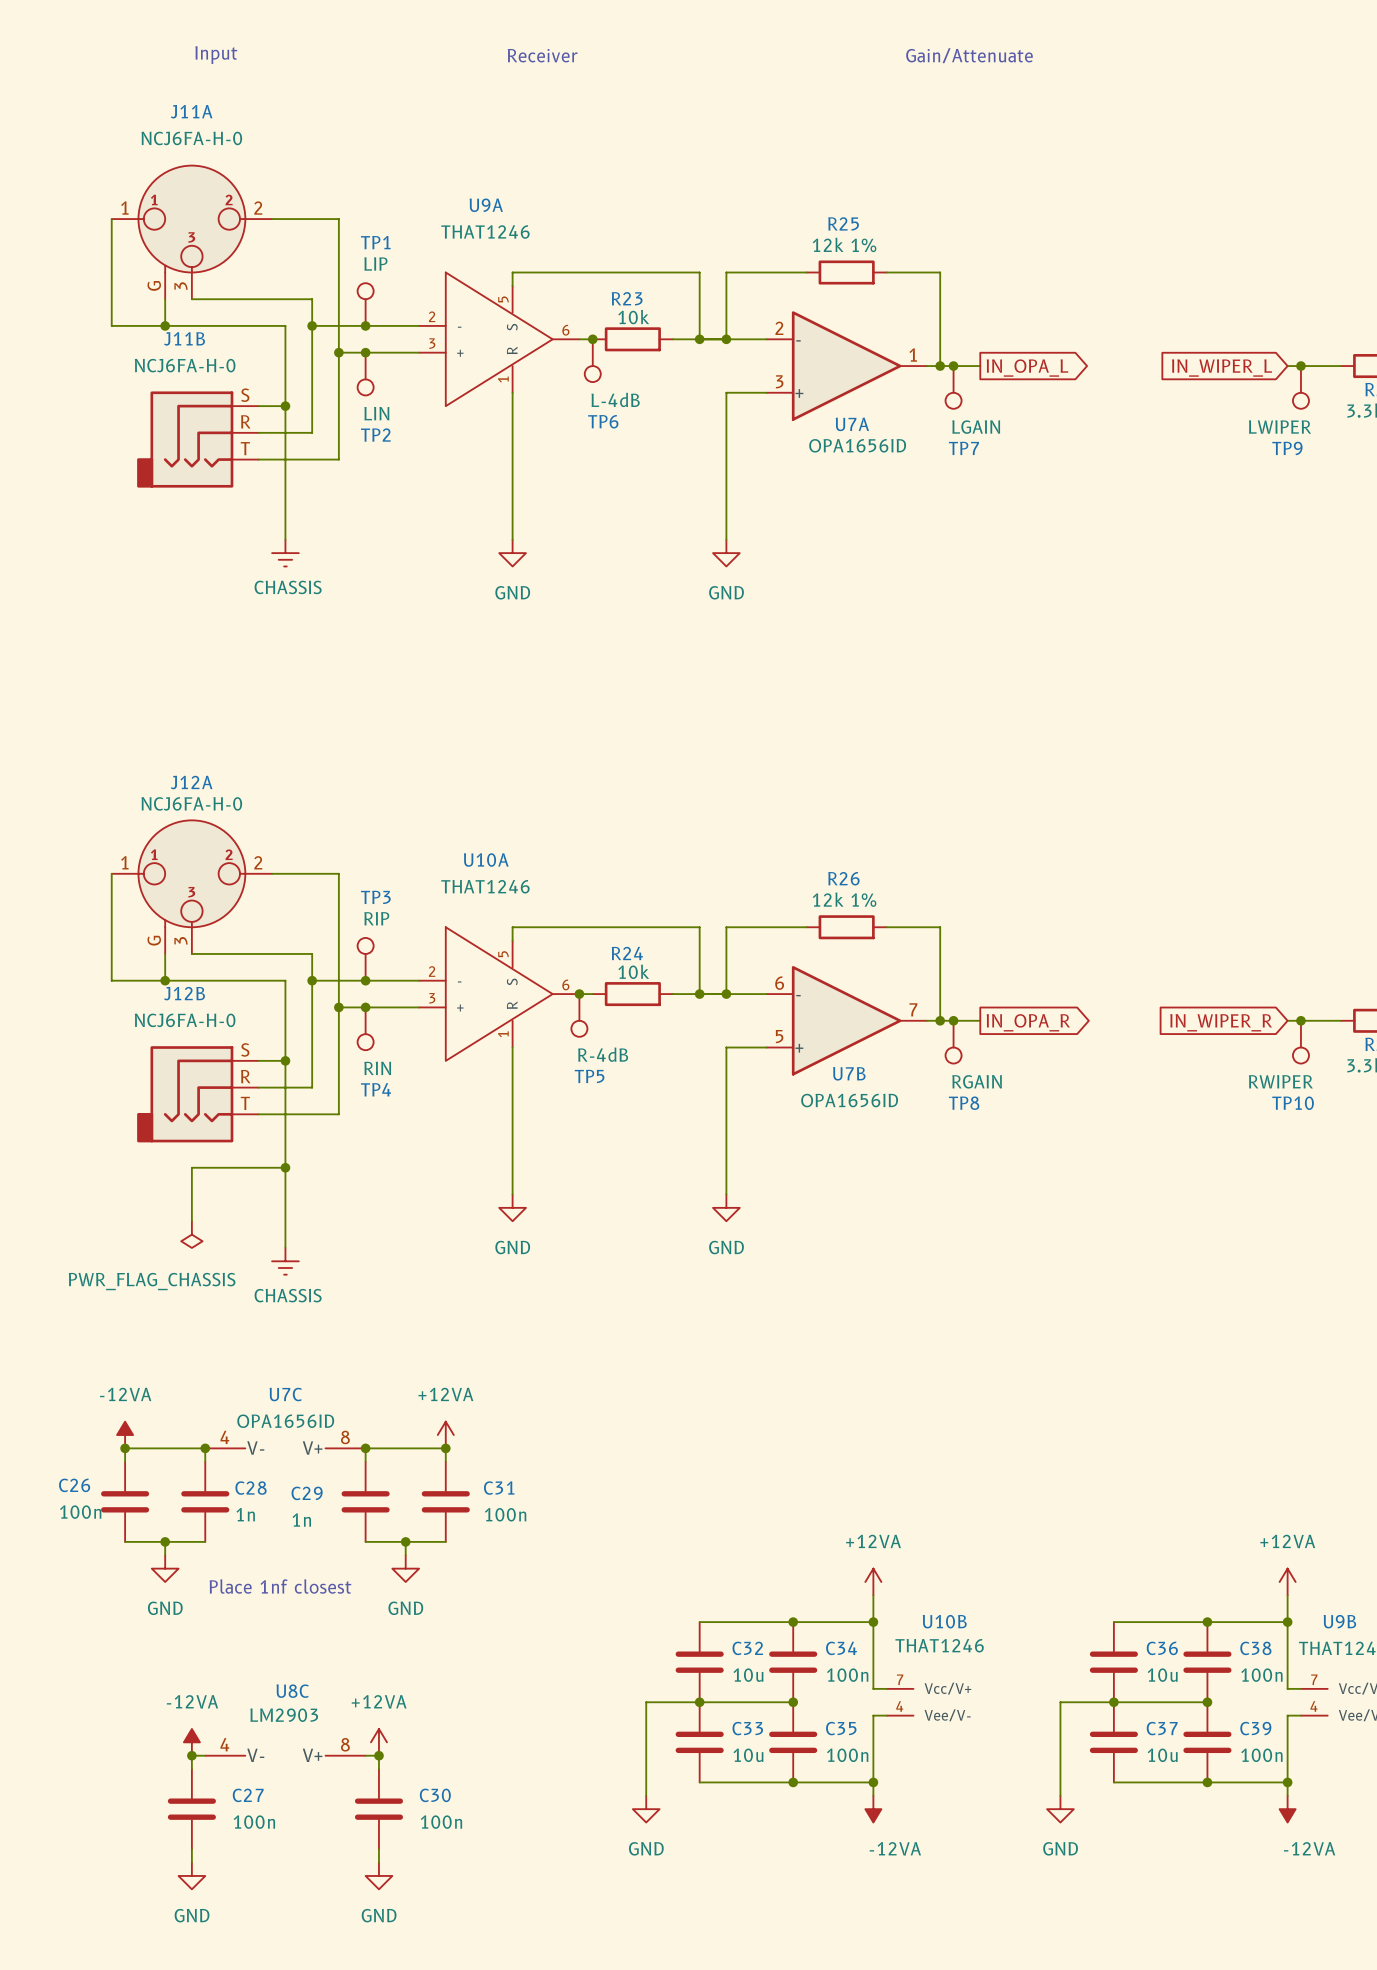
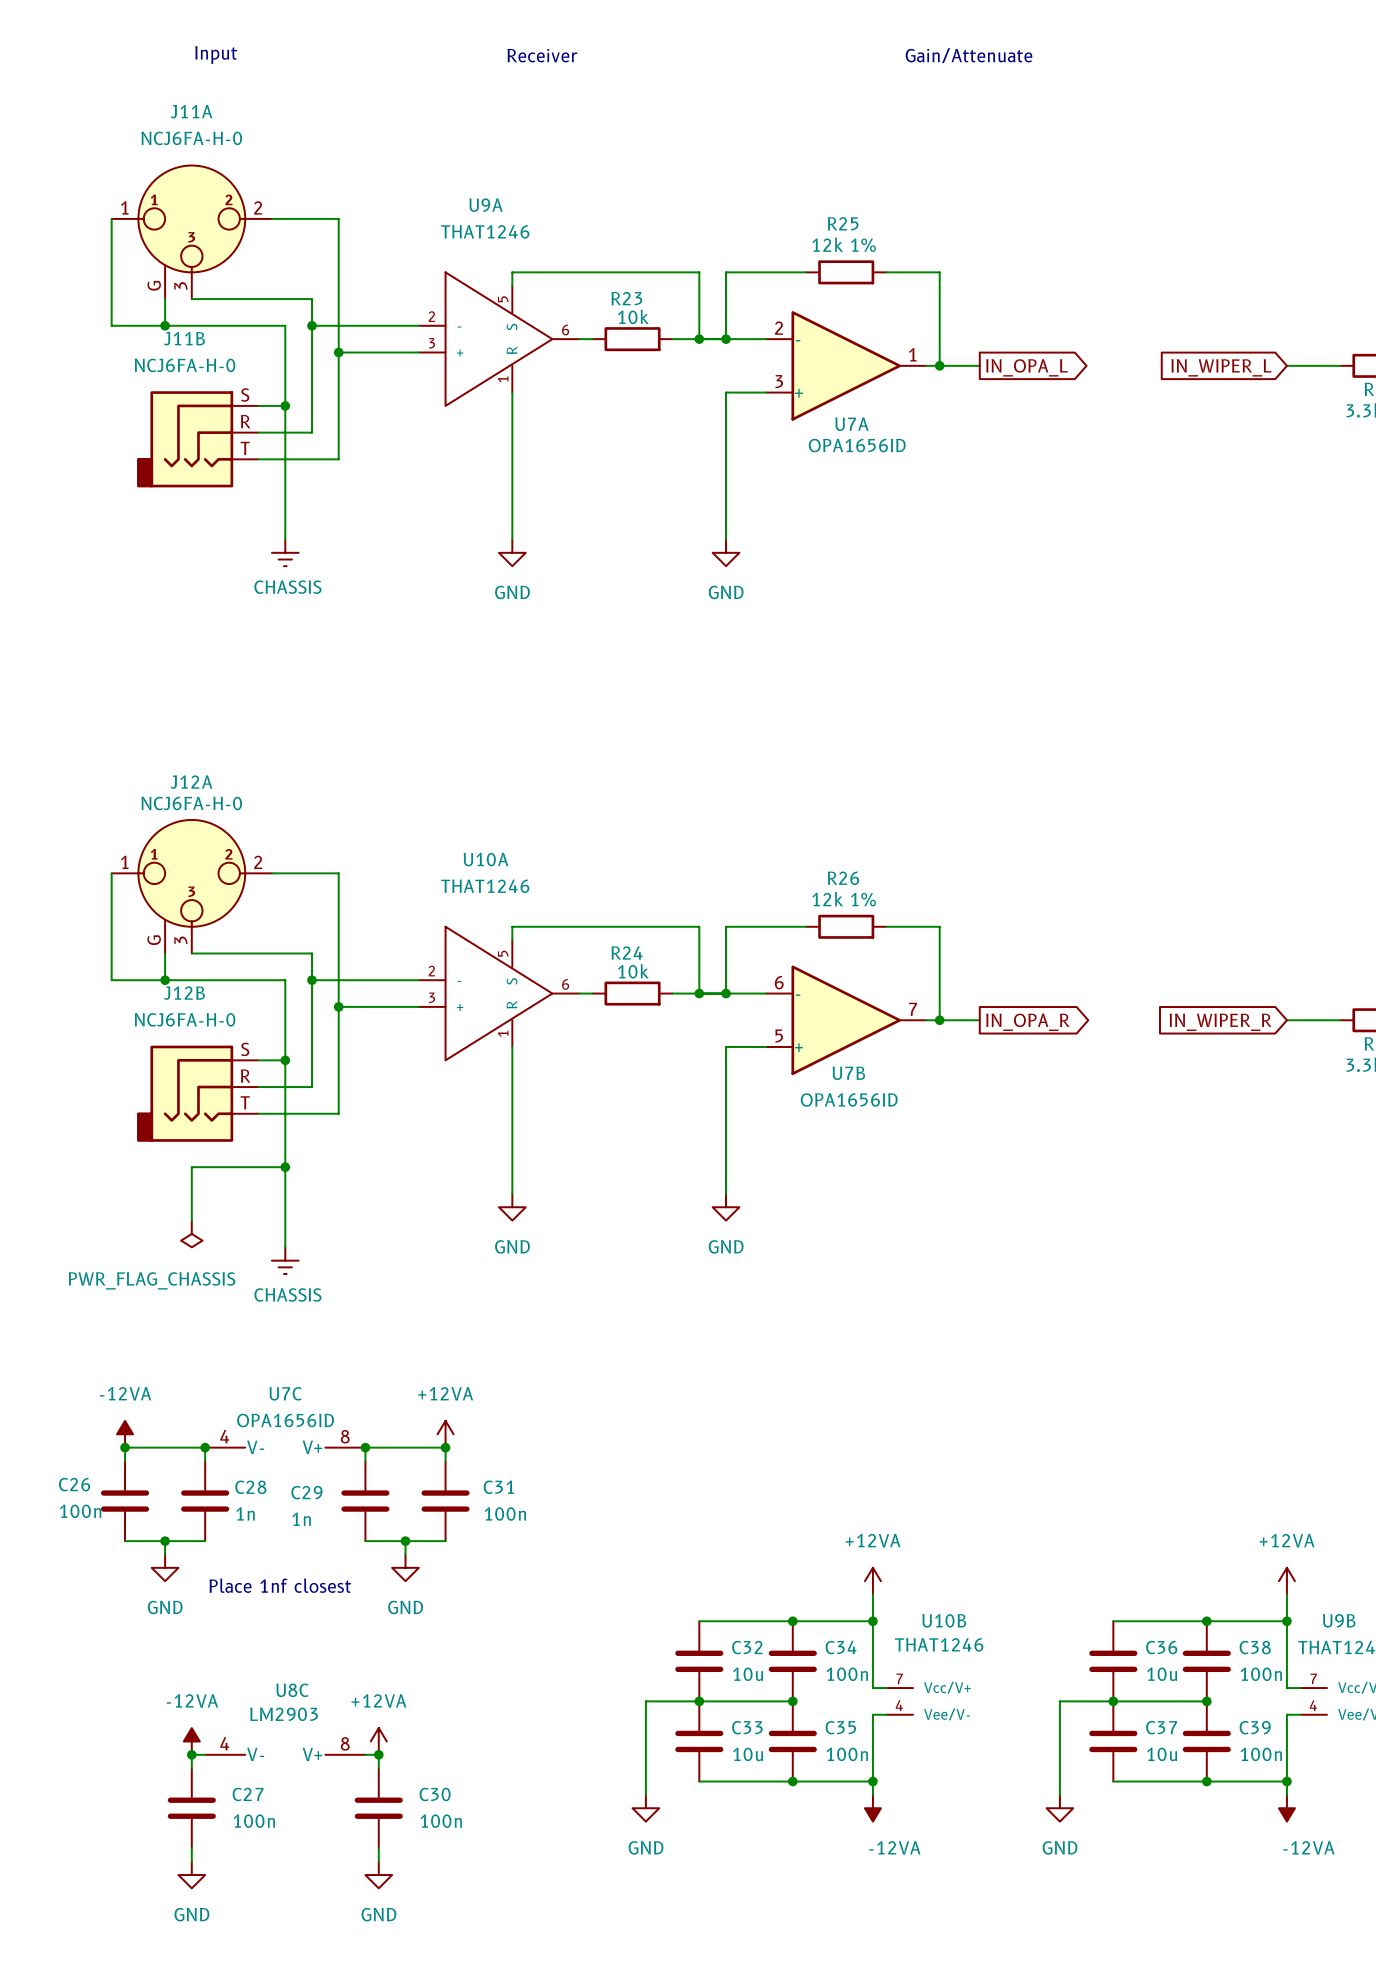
TP1: LIP (365, 304) -> none
junction: (365, 325) -> none
junction: (592, 339) -> none
junction: (365, 352) -> none
TP6: L-4dB (592, 360) -> none
junction: (953, 366) -> none
junction: (1300, 366) -> none
TP2: LIN (365, 374) -> none
TP7: LGAIN (953, 387) -> none
TP9: LWIPER (1300, 387) -> none
TP3: RIP (365, 959) -> none
junction: (365, 980) -> none
junction: (579, 994) -> none
junction: (365, 1007) -> none
TP5: R-4dB (579, 1015) -> none
junction: (953, 1020) -> none
junction: (1300, 1020) -> none
TP4: RIN (365, 1028) -> none
TP8: RGAIN (953, 1042) -> none
TP10: RWIPER (1300, 1042) -> none

